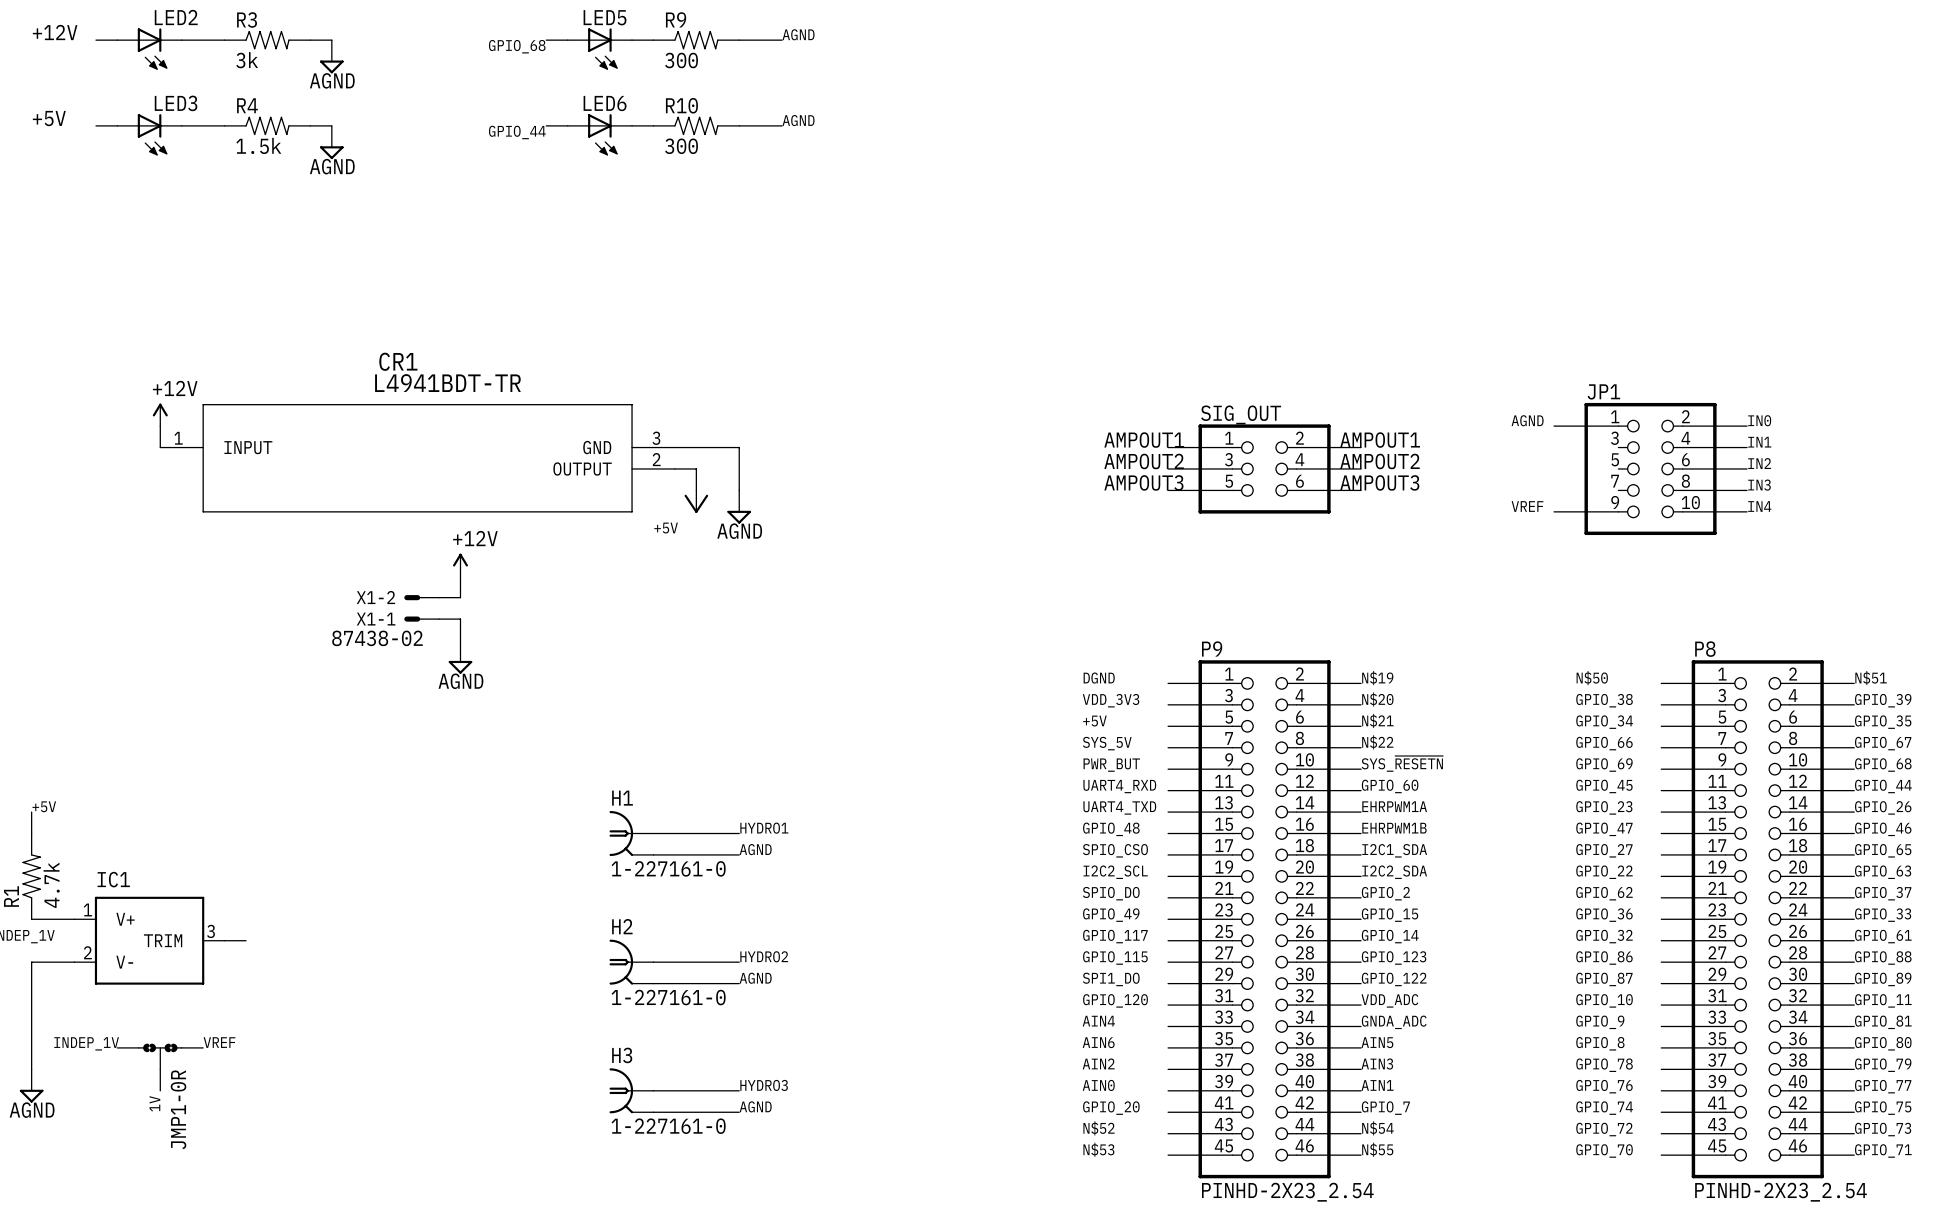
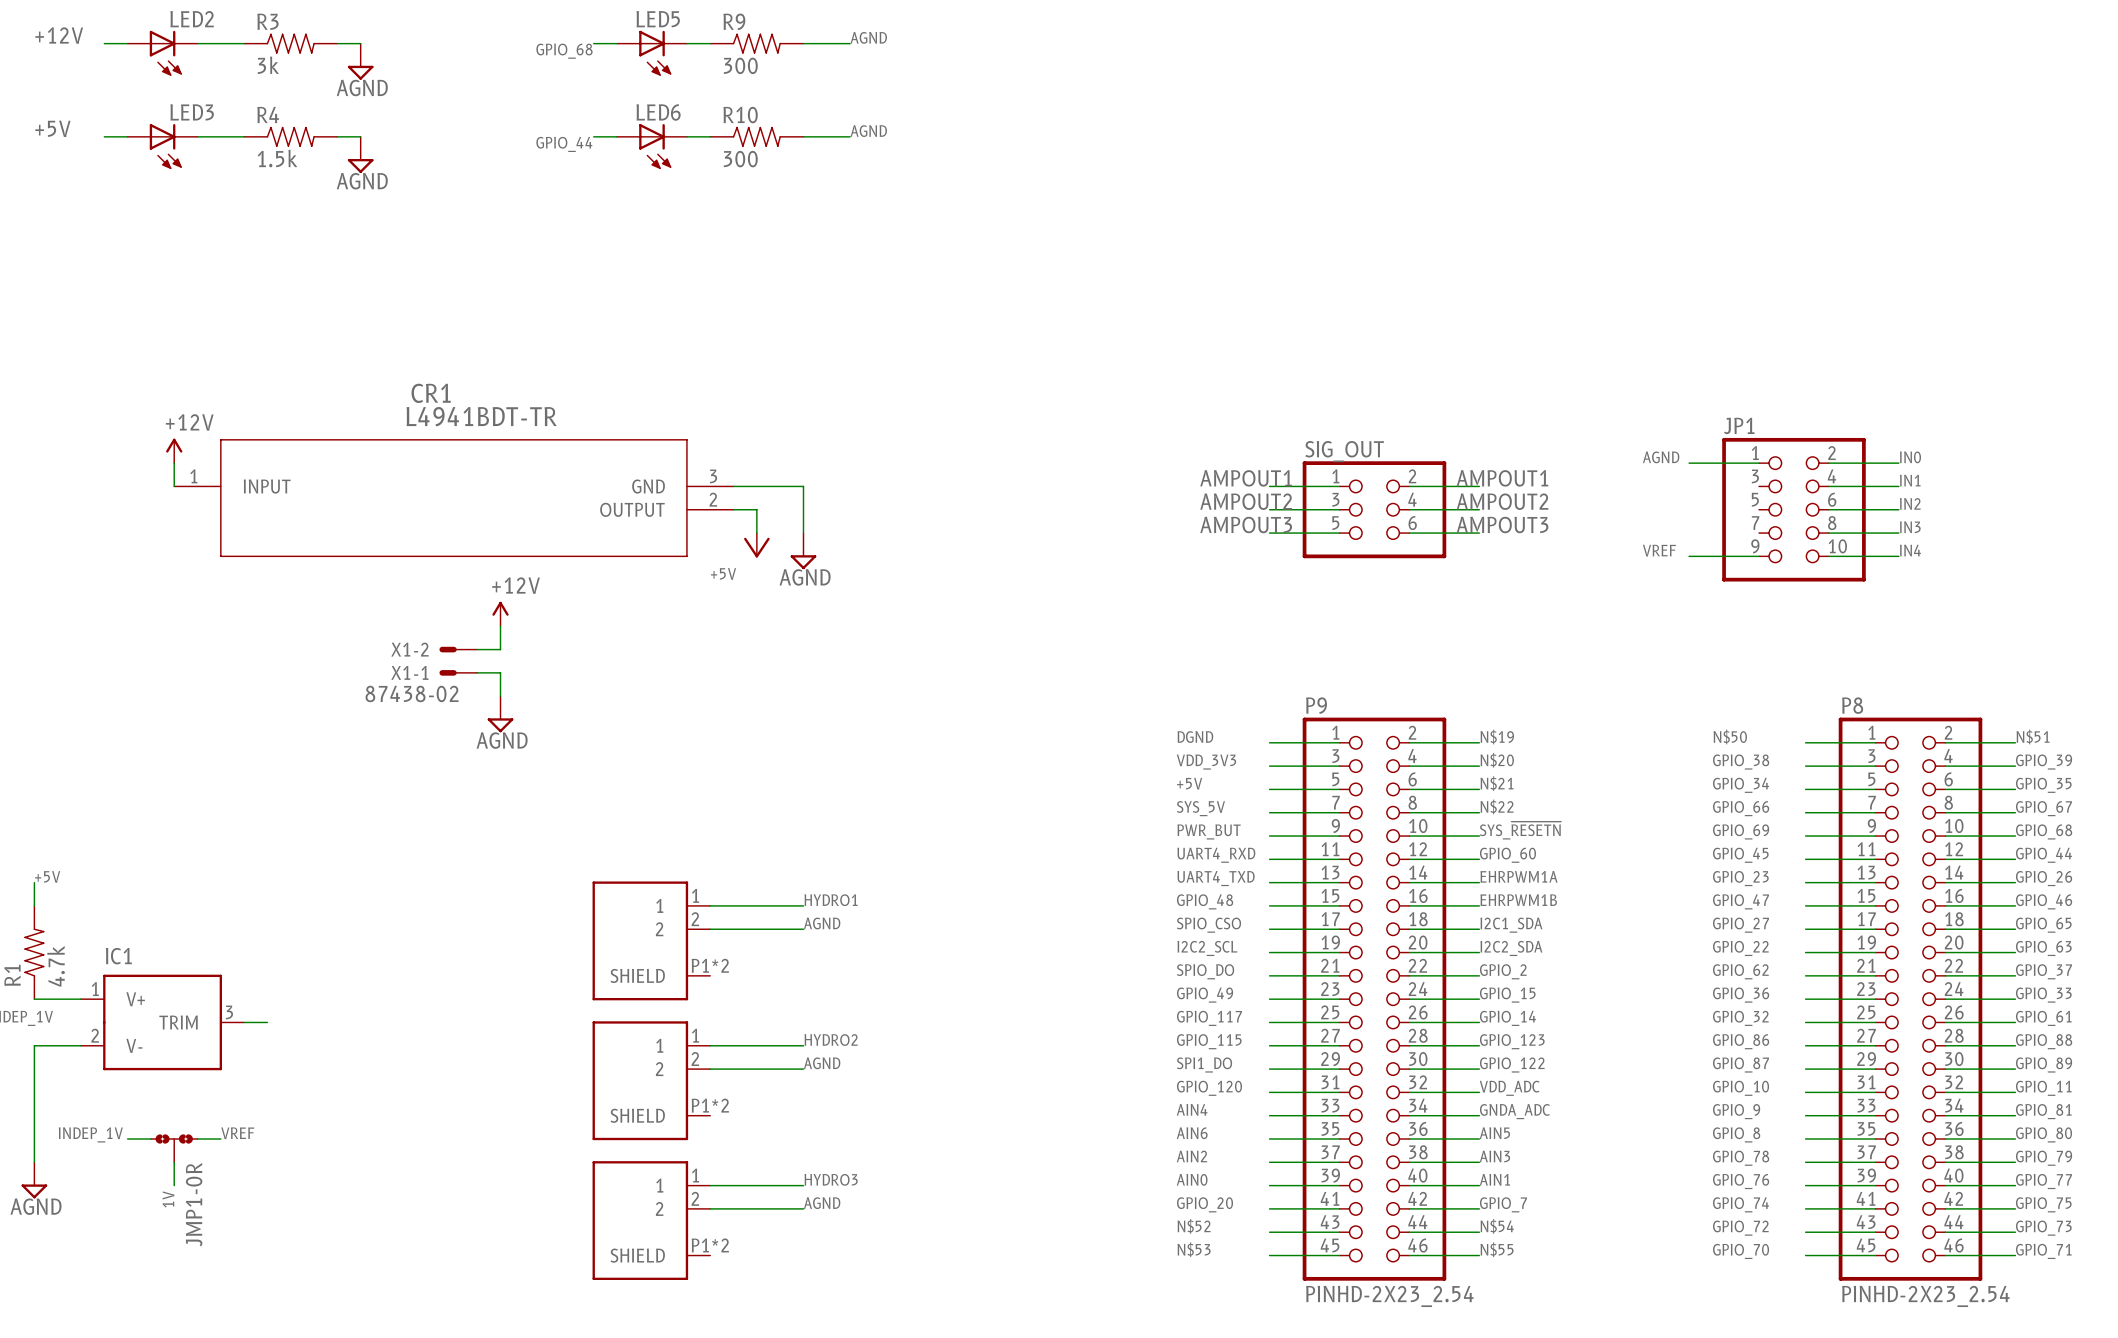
H1: 1-227161-0 (631, 833) -> none
part: none -> (651, 940)
H2: 1-227161-0 (631, 962) -> none
part: none -> (651, 1080)
H3: 1-227161-0 (631, 1090) -> none
part: none -> (651, 1220)

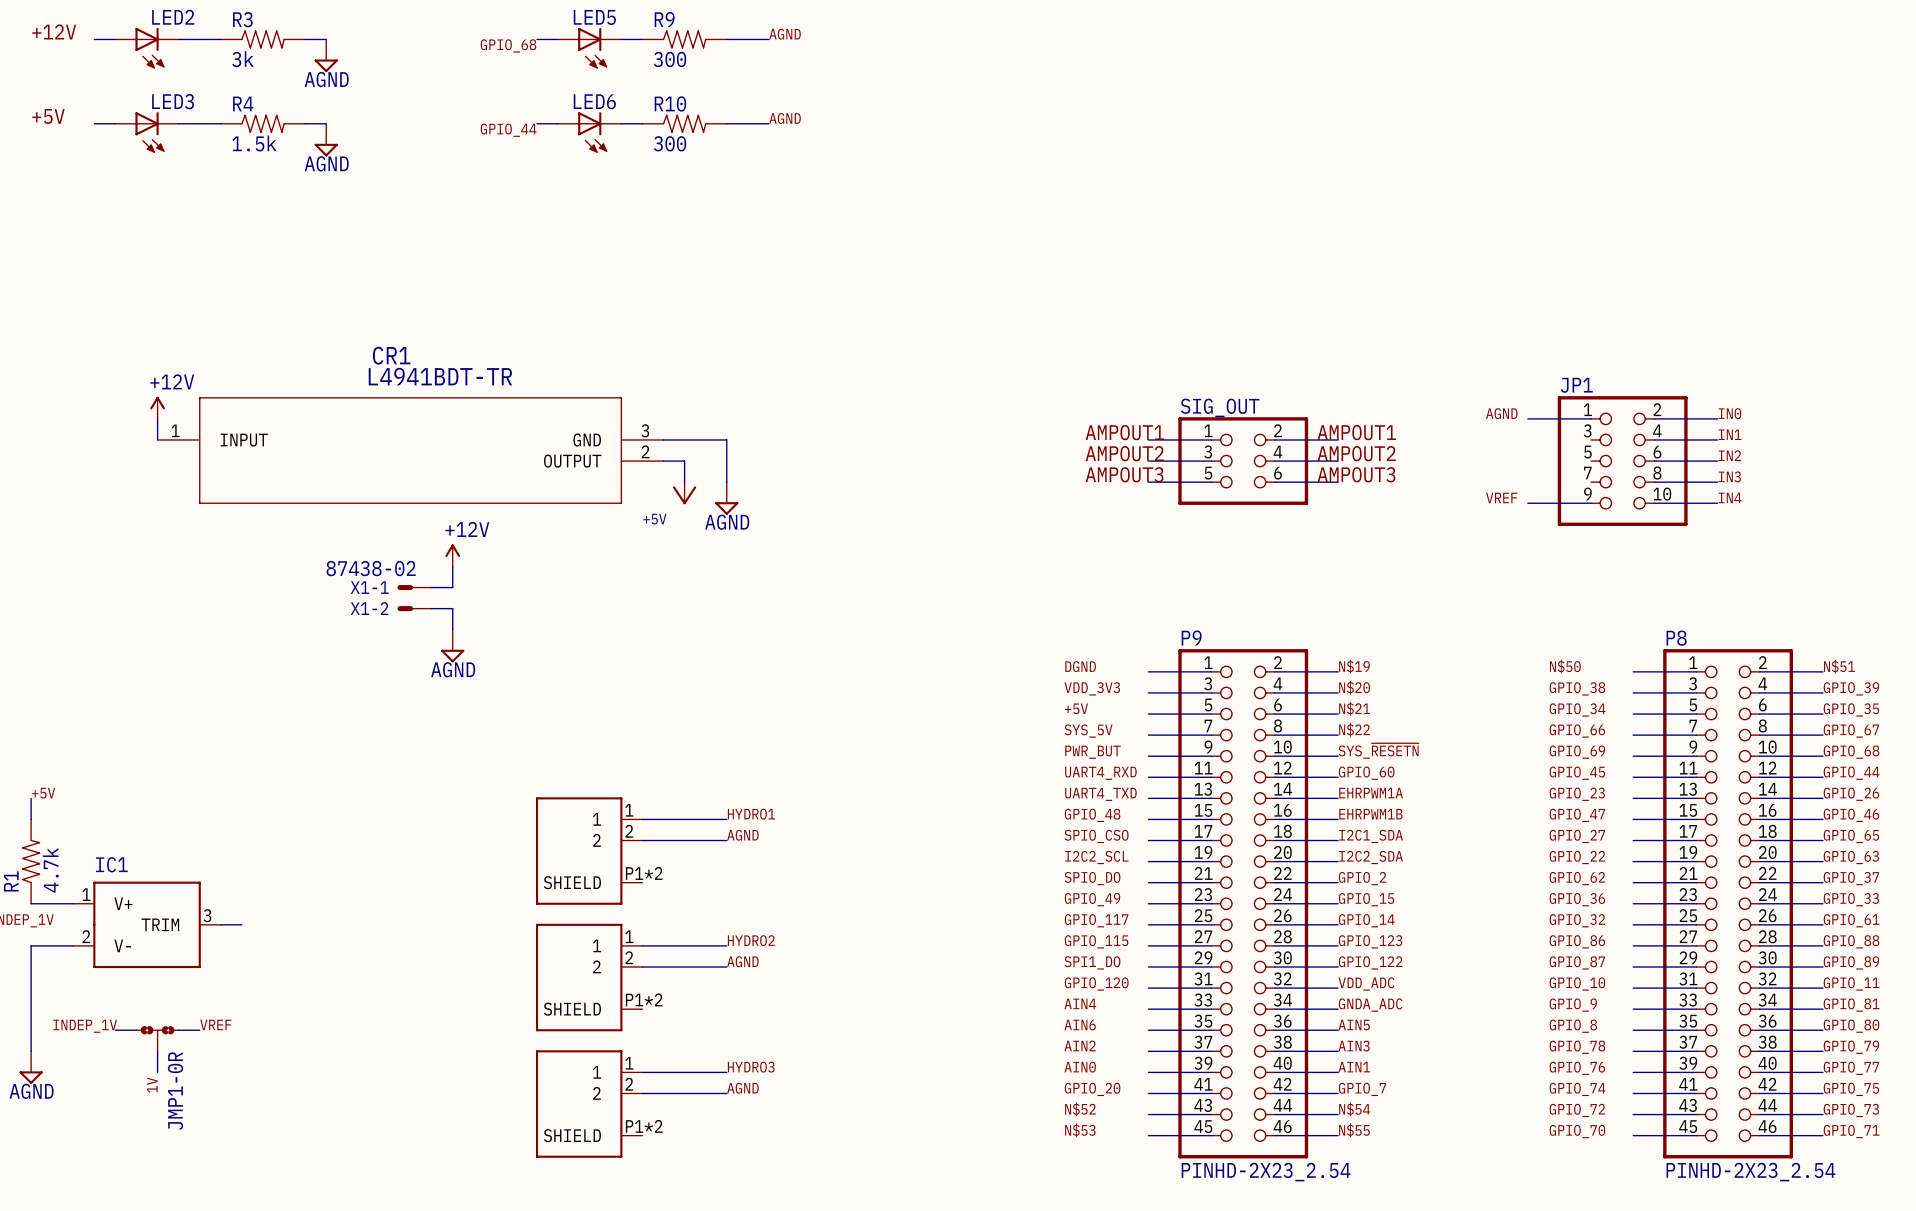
X1-2 value: none -> 87438-02 (371, 568)
X1-2 name: X1-2 (409, 649) -> X1-1 (369, 587)
X1-1 name: X1-1 (409, 672) -> X1-2 (369, 608)
X1-1 value: 87438-02 (412, 693) -> none

